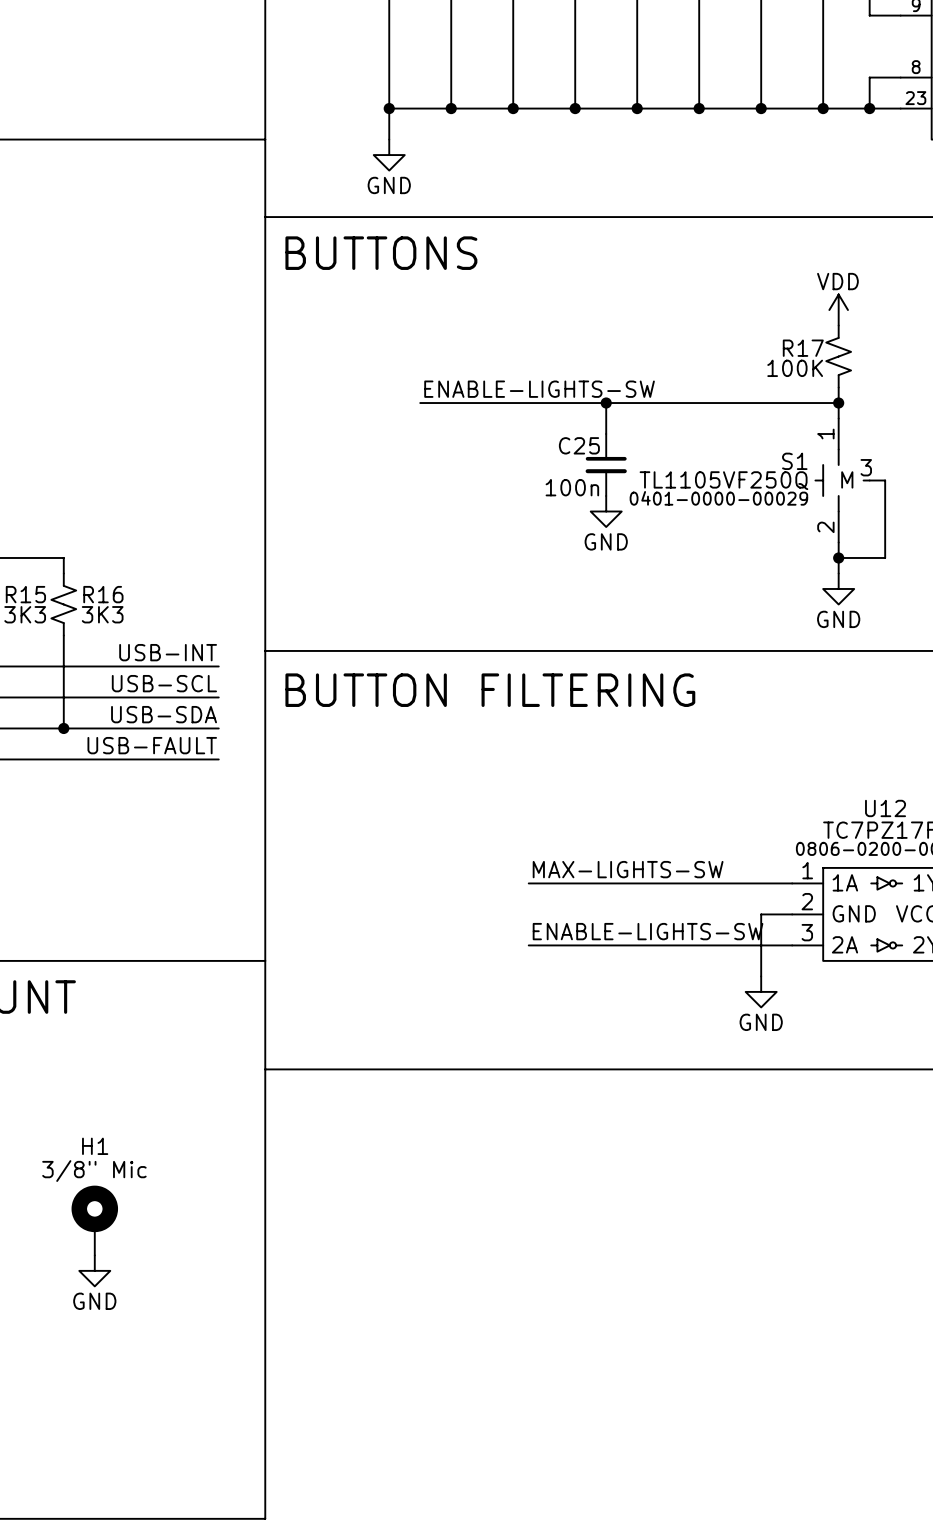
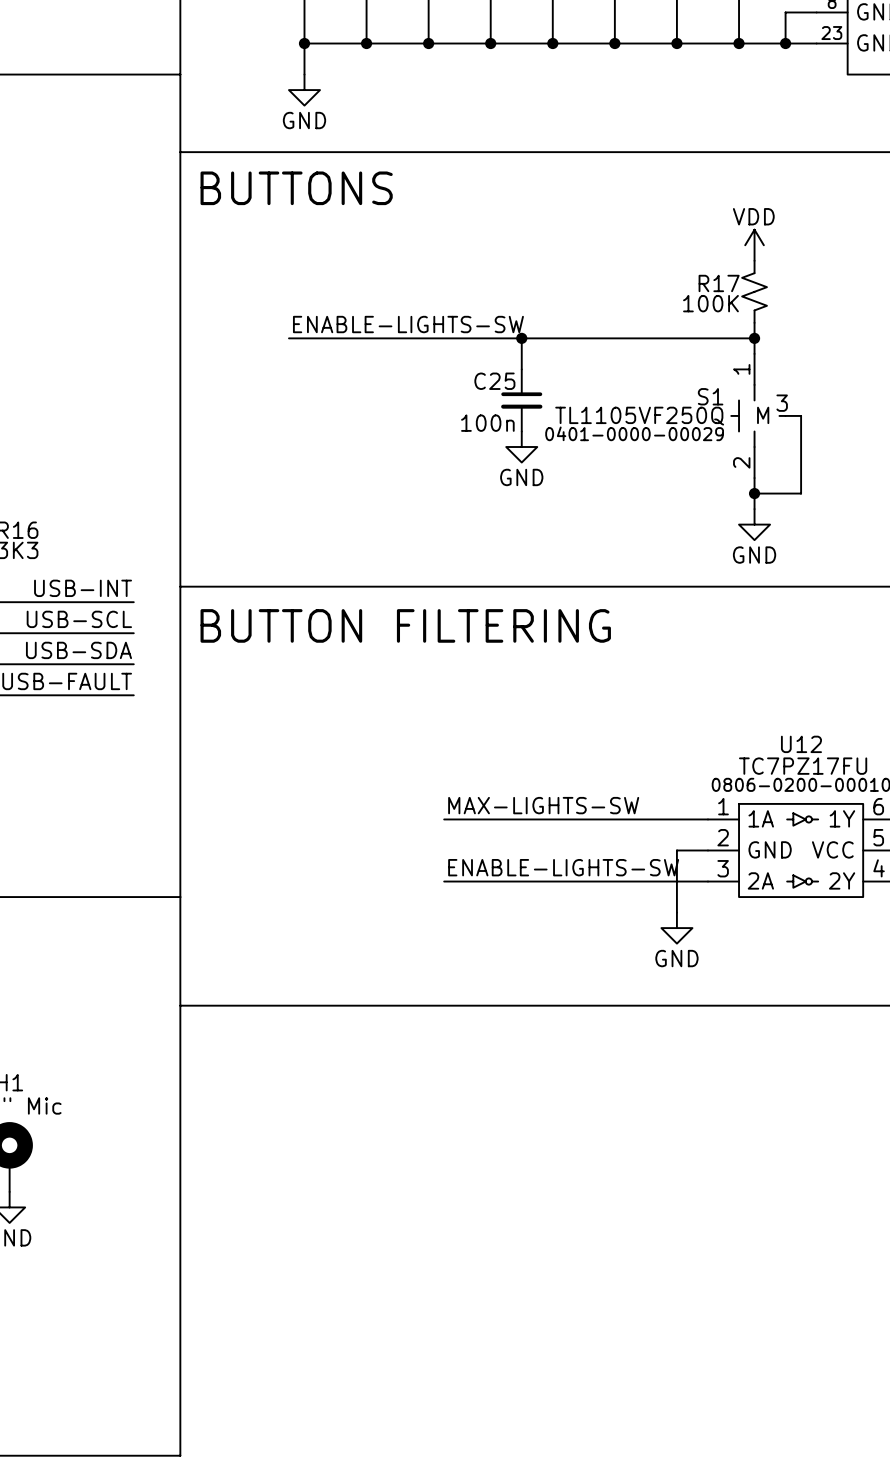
label position: ENABLE-LIGHTS-SW (539, 389) -> ENABLE-LIGHTS-SW (408, 324)
wire: none -> (288, 338) (335, 338)

